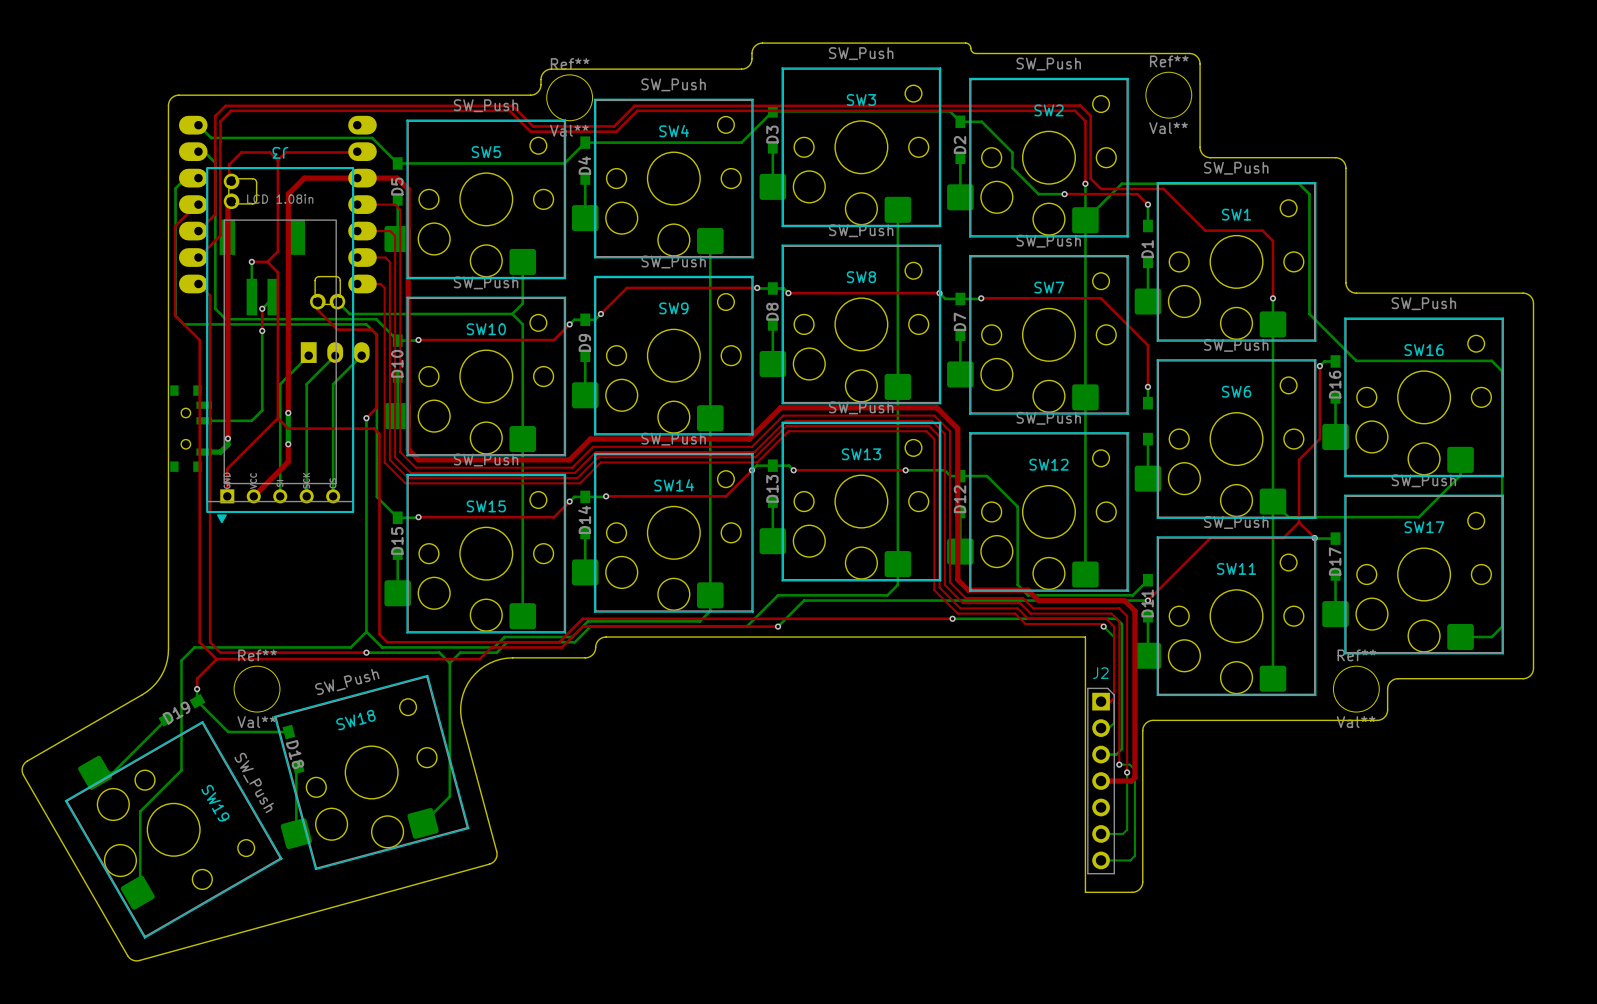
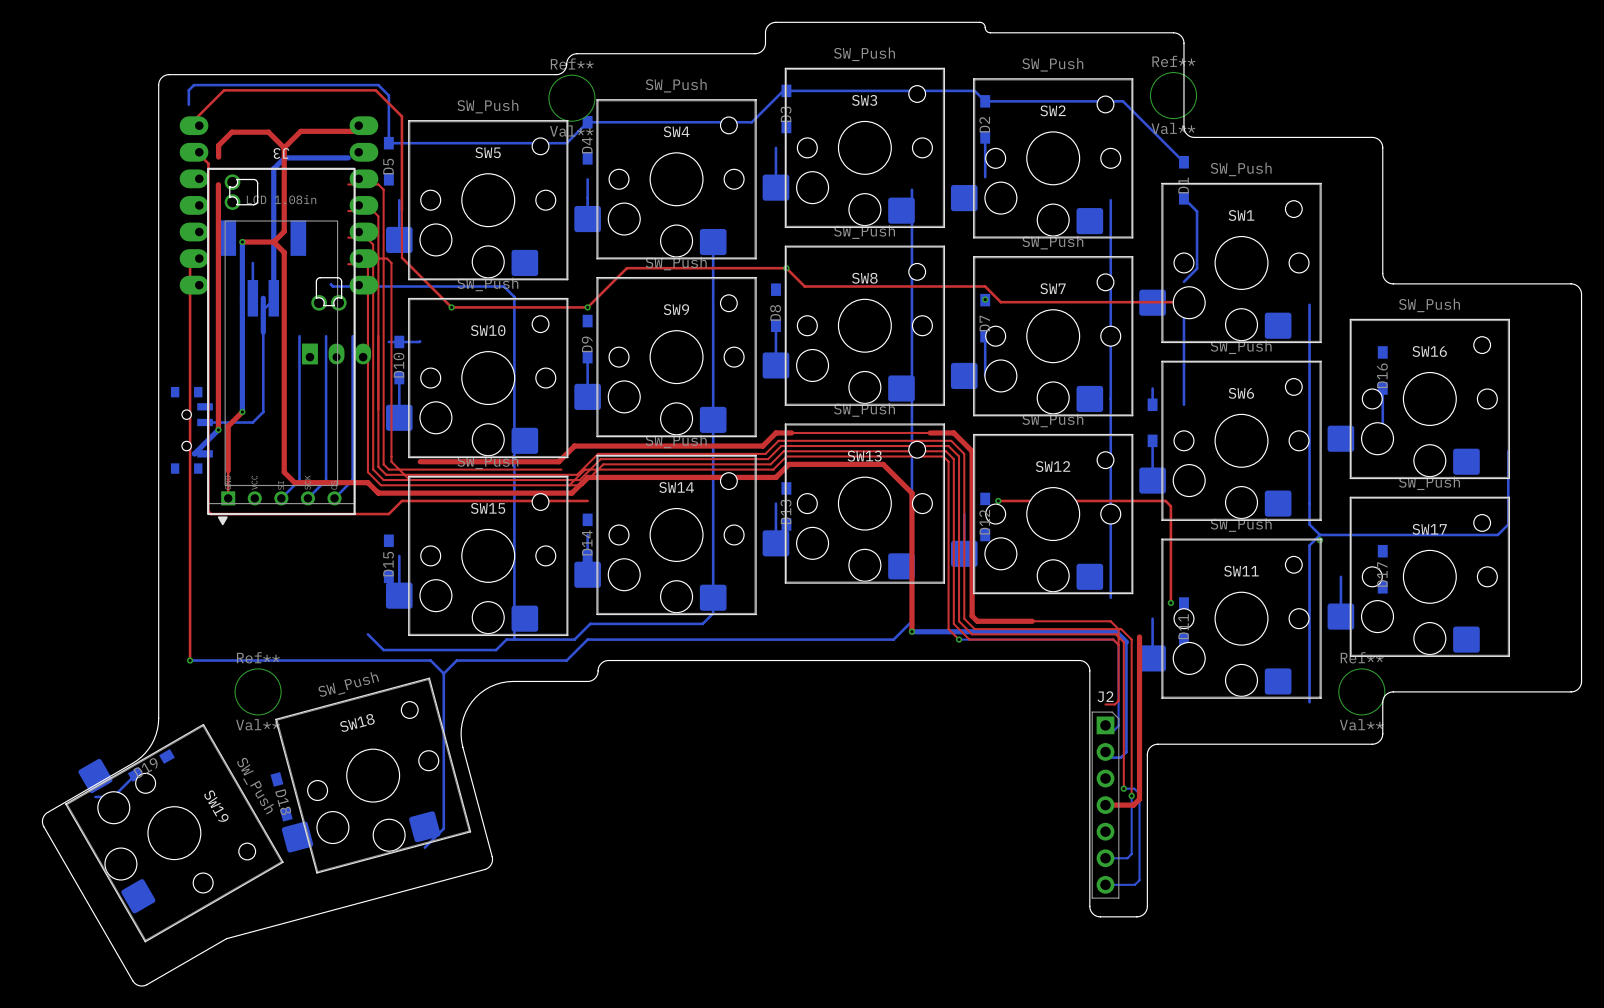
bottom track: none -> (188, 104) (188, 90) (194, 85) (378, 85) (388, 95) (388, 143) (566, 143) (587, 122) (751, 122) (783, 90) (974, 90) (985, 101) (1123, 101) (1183, 162)
bottom track: (198, 125) (211, 137) (372, 137) (397, 163) (564, 163) (585, 142) (741, 142) (772, 111) (949, 111) (960, 121) (981, 121) (1012, 152) (1012, 168) (1038, 194) (1064, 194) -> none
D3 position: (772, 129) -> (786, 108)
top track: none -> (358, 131) (300, 131) (284, 147)
D2 position: (960, 139) -> (985, 119)
top track: (220, 142) (220, 121) (230, 110) (509, 110) (530, 131) (616, 131) (637, 110) (1075, 110) (1085, 121) (1085, 183) -> none
top track: (220, 142) (220, 235) (198, 257) -> none
top track: none -> (284, 147) (284, 231) (273, 242)
top track: none -> (284, 147) (268, 132) (231, 132) (218, 145) (218, 157)
bottom track: (198, 151) (204, 151) (215, 162) (215, 308) (225, 319) (376, 319) (397, 340) -> (388, 341) (399, 341)
top track: (356, 152) (285, 152) (277, 160) -> none
top track: none -> (188, 157) (202, 157) (208, 163) (208, 511) (211, 514) (388, 514) (401, 500) (587, 500)
bottom track: none -> (348, 157) (284, 157) (273, 168) (273, 298)
bottom track: (960, 157) (960, 197) -> (985, 137) (985, 177)
top track: (277, 160) (277, 251) (267, 261) -> none
top track: (277, 160) (270, 152) (241, 152) (229, 164) (229, 179) -> none
D4 position: (585, 160) -> (587, 140)
bottom track: (198, 178) (185, 178) (175, 188) (175, 315) (184, 324) (366, 324) (376, 334) (376, 496) (397, 517) (418, 517) -> none
D5 position: (397, 181) -> (388, 161)
top track: none -> (218, 184) (218, 429)
bottom track: (1085, 183) (1085, 574) -> none
via: (1085, 183) -> none
top track: (1064, 194) (1137, 194) (1147, 204) -> none
via: (1064, 194) -> none
bottom track: none -> (1183, 198) (1197, 211) (1197, 268) (1183, 281)
bottom track: none -> (1110, 200) (1110, 597)
top track: (198, 204) (174, 226) (174, 315) (199, 340) (199, 642) (216, 659) -> none
top track: (227, 204) (227, 438) -> none
top track: (357, 204) (395, 204) (400, 209) -> (188, 131) (188, 125) (224, 90) (375, 90) (401, 116) (401, 210)
bottom track: (1147, 204) (1147, 225) -> none
via: (1147, 204) -> none
bottom track: (897, 209) (897, 584) (887, 595) (778, 595) (746, 626) (590, 626) (574, 642) (507, 642) (496, 652) (460, 652) (455, 657) -> (911, 189) (911, 621) (893, 639) (587, 639) (566, 660) (456, 660)
bottom track: (1085, 220) (1121, 183) (1299, 183) (1309, 194) (1309, 314) (1356, 360) (1491, 360) (1502, 371) (1502, 449) -> none
top track: (198, 231) (215, 214) (215, 116) (225, 105) (512, 105) (533, 126) (614, 126) (634, 105) (1080, 105) (1090, 116) (1090, 178) (1101, 188) (1163, 188) (1205, 230) (1262, 230) (1272, 241) (1272, 298) -> none
top track: (357, 231) (390, 231) (395, 235) (395, 457) (410, 472) -> none
top track: none -> (348, 237) (366, 237) (373, 244) (373, 469) (383, 480) (409, 480)
top track: none -> (242, 242) (273, 242)
bottom track: none -> (242, 242) (242, 412)
top track: none -> (273, 242) (284, 252) (284, 472) (294, 482) (367, 482) (378, 493) (571, 493) (587, 477) (775, 477) (789, 464) (883, 464) (911, 493) (911, 631)
D1 position: (1147, 243) -> (1183, 180)
top track: (400, 256) (400, 452) (415, 467) -> (348, 184) (378, 184) (383, 189) (383, 464) (388, 469) (417, 469)
top track: none -> (401, 257) (451, 307) (587, 307) (626, 268) (786, 268) (804, 286) (985, 286) (1000, 302) (1183, 302)
top track: (251, 261) (267, 261) -> none
via position: (251, 261) -> (242, 242)
top track: (267, 261) (277, 272) (277, 418) -> none
bottom track: (522, 261) (522, 303) (512, 314) -> none
bottom track: (1147, 261) (1147, 301) -> none
top track: none -> (188, 264) (190, 660)
via: none -> (786, 268)
top track: (198, 283) (210, 295) (210, 642) (220, 652) (366, 652) -> none
bottom track: none -> (331, 284) (332, 286) (503, 286) (514, 296) (514, 639)
top track: (357, 283) (380, 283) (384, 287) (384, 462) (405, 483) -> (348, 264) (363, 264) (367, 268) (367, 472) (381, 485) (407, 485)
top track: (757, 287) (626, 287) (600, 314) -> none
bottom track: (757, 287) (783, 288) (788, 293) -> none
via: (757, 287) -> none
top track: (788, 293) (939, 293) -> none
via: (788, 293) -> none
bottom track: (939, 293) (945, 298) (981, 298) -> none
via: (939, 293) -> none
bottom track: none -> (263, 298) (263, 332)
top track: (981, 298) (1101, 298) (1147, 345) (1147, 386) -> none
bottom track: (1272, 298) (1272, 678) -> none
via: (1272, 298) -> none
bottom track: none -> (1183, 302) (1183, 404)
bottom track: (340, 303) (349, 314) (512, 314) -> none
bottom track: none -> (1309, 304) (1309, 524) (1319, 534)
via: none -> (587, 307)
top track: (262, 308) (262, 330) -> none
via: (262, 308) -> none
top track: (316, 309) (337, 329) (371, 329) (376, 334) -> (348, 211) (373, 211) (378, 216) (378, 336)
bottom track: (512, 314) (522, 324) (522, 616) -> none
bottom track: (600, 314) (595, 319) (574, 319) (569, 324) -> none
via: (600, 314) -> none
D7 position: (960, 316) -> (985, 318)
top track: (569, 324) (554, 340) (418, 340) -> none
via: (569, 324) -> none
via: (262, 330) -> none
bottom track: (960, 334) (960, 374) -> (985, 336) (985, 375)
via position: (418, 340) -> (451, 307)
bottom track: (308, 355) (280, 384) (280, 496) -> (299, 336) (299, 480) (281, 498)
bottom track: (335, 355) (306, 384) (306, 496) -> (326, 336) (326, 480) (307, 498)
bottom track: (361, 355) (333, 384) (333, 496) -> (352, 336) (352, 480) (334, 498)
bottom track: (1335, 361) (1324, 361) (1319, 366) -> none
top track: (1319, 366) (1319, 439) (1299, 459) (1299, 522) -> none
via: (1319, 366) -> none
D16 position: (1335, 379) -> (1382, 370)
via: (1147, 386) -> none
bottom track: (1335, 397) (1335, 436) -> (1382, 388) (1382, 428)
top track: (376, 407) (366, 418) -> (378, 409) (378, 466) (386, 474) (412, 474)
via: none -> (242, 412)
top track: (288, 412) (288, 194) (304, 178) (397, 178) (408, 188) (408, 449) (418, 459) -> none
bottom track: (288, 412) (288, 444) -> none
via: (288, 412) -> none
top track: (277, 418) (227, 468) -> (242, 412) (228, 426) (228, 470)
top track: (277, 418) (288, 428) (374, 428) (379, 433) (379, 634) (387, 642) (559, 642) (582, 618) (952, 618) -> none
bottom track: (366, 418) (366, 631) (350, 647) (194, 647) (181, 660) (181, 770) (140, 811) (140, 890) (137, 892) -> none
via: (366, 418) -> none
bottom track: none -> (218, 429) (194, 453)
top track: (788, 431) (757, 462) -> (953, 459) (945, 451) (783, 451) (770, 464) (760, 464)
top track: (926, 431) (934, 439) (934, 590) (957, 613) (1015, 613) (1025, 624) (1101, 624) (1103, 626) -> (930, 432) (953, 432) (972, 451) (972, 616) (977, 621) (1032, 621)
bottom track: (227, 438) (227, 444) (220, 452) (204, 452) -> none
via position: (227, 438) -> (218, 429)
top track: (288, 444) (288, 461) (253, 496) -> none
via: (288, 444) -> none
top track: (754, 452) (785, 420) (931, 420) (944, 433) (944, 459) -> (569, 485) (585, 469) (773, 469) (786, 456) (943, 456) (948, 461)
top track: none -> (757, 453) (765, 453) (778, 440) (951, 440) (964, 453) (964, 618) (974, 629) (1121, 629) (1131, 639)
top track: (755, 457) (786, 426) (929, 426) (939, 436) (939, 587) (960, 608) (1017, 608) (1028, 618) -> (758, 459) (768, 459) (781, 446) (948, 446) (959, 456) (959, 621) (972, 634) (1115, 634) (1123, 642)
top track: (949, 457) (949, 431) (934, 415) (783, 415) (751, 446) (593, 446) (572, 467) (559, 467) -> none
top track: (556, 459) (569, 459) (590, 439) (749, 439) (780, 407) (936, 407) (957, 428) (957, 579) (968, 590) (1028, 590) (1038, 600) (1124, 600) (1134, 610) (1134, 634) -> (558, 461) (574, 446) (762, 446) (775, 432) (791, 432)
bottom track: (1460, 459) (1460, 475) (1418, 517) (1288, 517) (1272, 501) -> none
top track: (751, 470) (726, 496) (606, 496) -> none
bottom track: (751, 470) (756, 465) (789, 465) (793, 470) -> none
via: (751, 470) -> none
top track: (793, 470) (905, 470) -> none
via: (793, 470) -> none
bottom track: (905, 470) (944, 470) (950, 476) (987, 476) (1017, 506) (1017, 584) (1028, 595) (1132, 595) (1147, 580) -> none
via: (905, 470) -> none
D13 position: (772, 483) -> (786, 506)
D12 position: (960, 494) -> (985, 516)
bottom track: (606, 496) (574, 496) (569, 501) -> none
via: (606, 496) -> none
top track: none -> (998, 500) (1165, 500) (1170, 506) (1170, 602)
via: none -> (998, 500)
top track: (569, 501) (554, 517) (418, 517) -> none
via: (569, 501) -> none
D14 position: (585, 514) -> (587, 537)
via: (418, 517) -> none
top track: (1299, 522) (1283, 538) (1210, 538) (1147, 600) -> none
top track: (1299, 522) (1314, 538) -> none
bottom track: (1502, 522) (1502, 626) (1491, 637) (1460, 637) -> (1508, 524) (1497, 534) (1319, 534)
bottom track: none -> (1319, 534) (1309, 545) (1309, 702)
D15 position: (397, 535) -> (388, 558)
bottom track: (1314, 538) (1334, 538) -> none
D17 position: (1335, 556) -> (1382, 569)
top track: (949, 582) (965, 597) (1022, 597) (1033, 608) (1119, 608) (1127, 616) (1127, 637) -> (953, 584) (953, 623) (969, 639) (1113, 639) (1118, 644)
top track: (944, 584) (963, 603) (1020, 603) (1030, 613) (1111, 613) (1119, 621) (1119, 639) -> (948, 587) (948, 629) (959, 639)
D11 position: (1147, 598) -> (1183, 621)
bottom track: (1147, 600) (804, 600) (778, 626) -> none
via position: (1147, 600) -> (1170, 602)
bottom track: (952, 618) (1116, 618) (1121, 624) (1121, 639) -> (911, 631) (1115, 631) (1126, 642)
via position: (952, 618) -> (959, 639)
top track: (778, 626) (582, 626) (561, 647) (491, 647) (479, 659) (216, 659) -> none
via: (778, 626) -> none
bottom track: (1103, 626) (1114, 637) (1114, 642) -> (959, 639) (1113, 639) (1118, 644)
via: (1103, 626) -> none
via: none -> (911, 631)
bottom track: (366, 652) (439, 652) (449, 663) (449, 796) (423, 823) -> none
via: (366, 652) -> none
bottom track: none -> (190, 660) (430, 660) (443, 673)
top track: (216, 659) (197, 678) (197, 689) -> none
bottom track: none -> (451, 665) (443, 673)
board edge: (1085, 668) (1085, 637) (606, 637) (598, 640) (594, 652) (587, 657) (512, 657) (495, 660) (479, 669) (468, 683) (463, 694) (460, 711) (496, 851) (496, 856) (493, 862) (139, 960) (130, 959) (23, 775) (22, 769) (27, 761) (146, 691) (158, 680) (167, 660) (168, 105) (170, 100) (178, 95) (531, 95) (539, 90) (542, 75) (549, 69) (742, 69) (750, 63) (754, 47) (762, 43) (965, 43) (969, 44) (971, 51) (976, 53) (1189, 53) (1195, 55) (1199, 62) (1200, 147) (1203, 155) (1210, 157) (1335, 157) (1344, 162) (1345, 168) (1345, 282) (1349, 290) (1356, 293) (1523, 293) (1528, 294) (1532, 299) (1533, 669) (1530, 675) (1524, 678) (1394, 679) (1387, 686) (1387, 713) (1383, 718) (1378, 720) (1150, 720) (1145, 723) (1143, 728) (1142, 751) -> (1089, 670) (1086, 663) (1079, 660) (608, 660) (601, 663) (596, 676) (589, 681) (513, 681) (495, 684) (480, 693) (471, 701) (465, 712) (461, 729) (462, 747) (492, 858) (488, 867) (226, 938) (147, 984) (136, 984) (43, 826) (42, 821) (47, 812) (137, 760) (148, 748) (157, 729) (158, 85) (160, 79) (169, 74) (557, 74) (564, 70) (568, 58) (576, 53) (757, 53) (764, 46) (767, 27) (774, 22) (979, 22) (983, 23) (986, 30) (990, 32) (1178, 33) (1183, 42) (1184, 128) (1186, 133) (1190, 136) (1372, 137) (1377, 139) (1382, 146) (1382, 273) (1386, 281) (1393, 283) (1571, 283) (1576, 285) (1580, 290) (1580, 684) (1576, 690) (1571, 691) (1390, 692) (1385, 694) (1383, 700) (1382, 737) (1378, 741) (1373, 744) (1157, 744) (1150, 747) (1147, 754)
bottom track: none -> (443, 673) (443, 828) (424, 847)
bottom track: (197, 689) (197, 700) (228, 732) (288, 732) -> none
via position: (197, 689) -> (190, 660)
D19 position: (181, 710) -> (151, 765)
bottom track: (166, 719) (112, 772) (95, 772) -> none
D18 position: (293, 749) -> (281, 796)
top track: none -> (1123, 767) (1123, 788)
bottom track: (1119, 764) (1129, 764) (1134, 769) (1134, 790) -> (1123, 788) (1134, 788) (1139, 793)
via: (1119, 764) -> none
bottom track: (298, 766) (296, 768) (296, 833) -> none
bottom track: none -> (135, 774) (113, 796) (95, 796)
top track: none -> (1131, 775) (1131, 795)
bottom track: (1127, 772) (1127, 792) -> none
via: (1127, 772) -> none
top track: (1134, 777) (1131, 781) (1101, 781) -> (1139, 780) (1139, 799) (1133, 805) (1105, 805)
J2 position: (1101, 781) -> (1105, 805)
via: none -> (1123, 788)
via: none -> (1131, 795)
bottom track: (1127, 829) (1122, 833) (1101, 833) -> (1131, 833) (1131, 854) (1127, 858) (1105, 858)
bottom track: (1134, 855) (1130, 860) (1101, 860) -> (1139, 859) (1139, 880) (1134, 884) (1105, 884)
board edge: (1142, 881) (1140, 888) (1134, 892) (1085, 892) -> (1147, 885) (1147, 908) (1144, 913) (1139, 916) (1095, 915) (1090, 909) (1089, 895)

